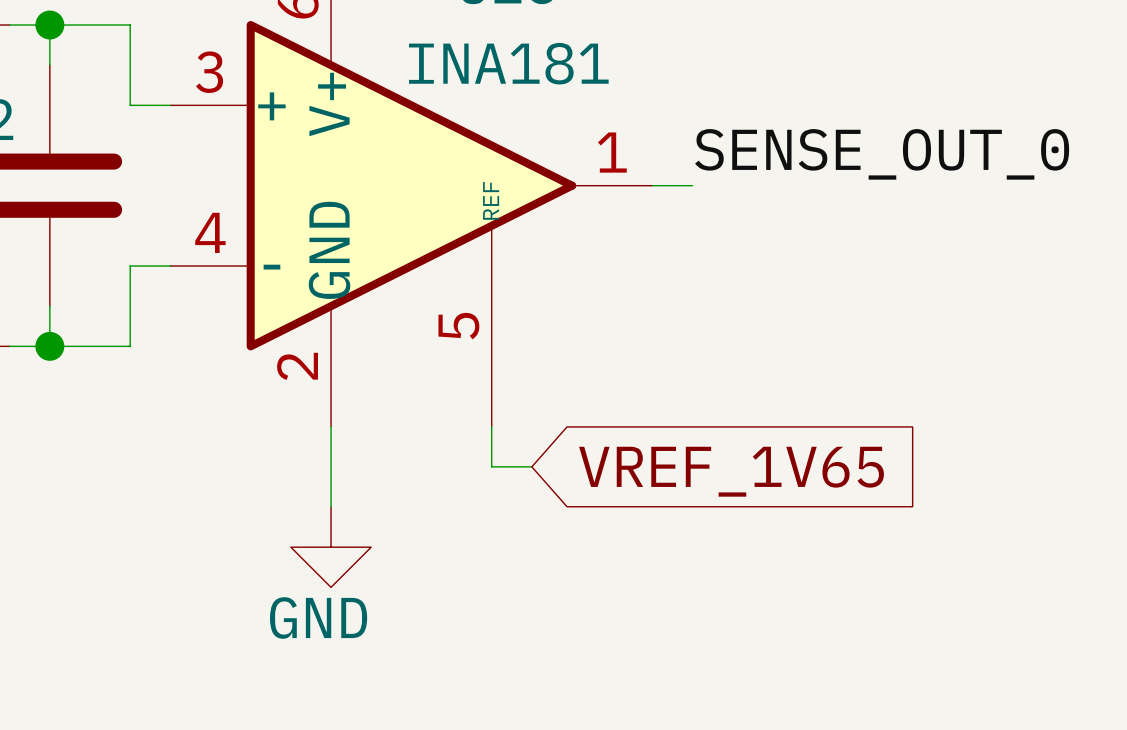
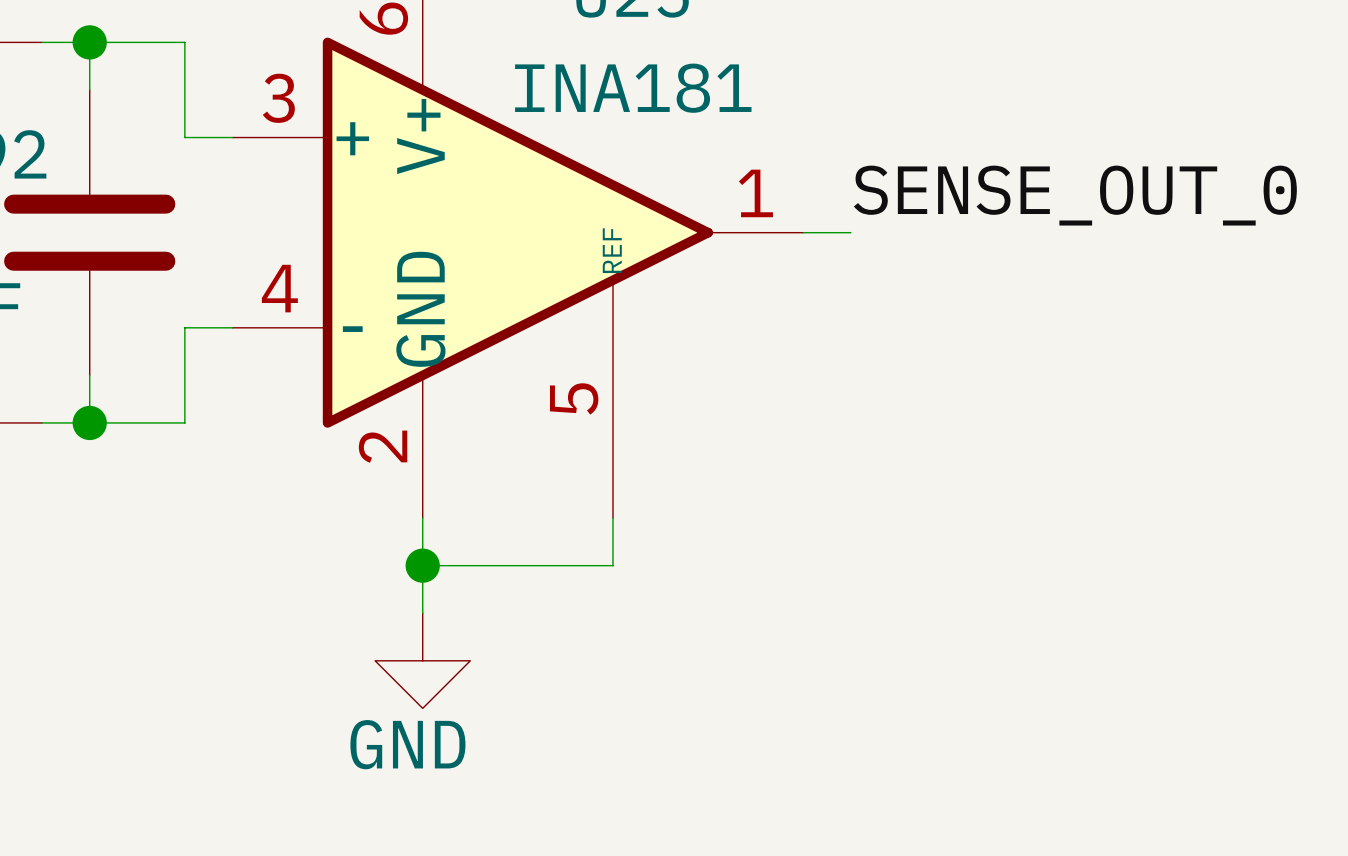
junction: none -> (422, 565)
wire: (491, 466) (531, 466) -> (612, 565) (422, 565)
global label: VREF_1V65 (731, 471) -> none

